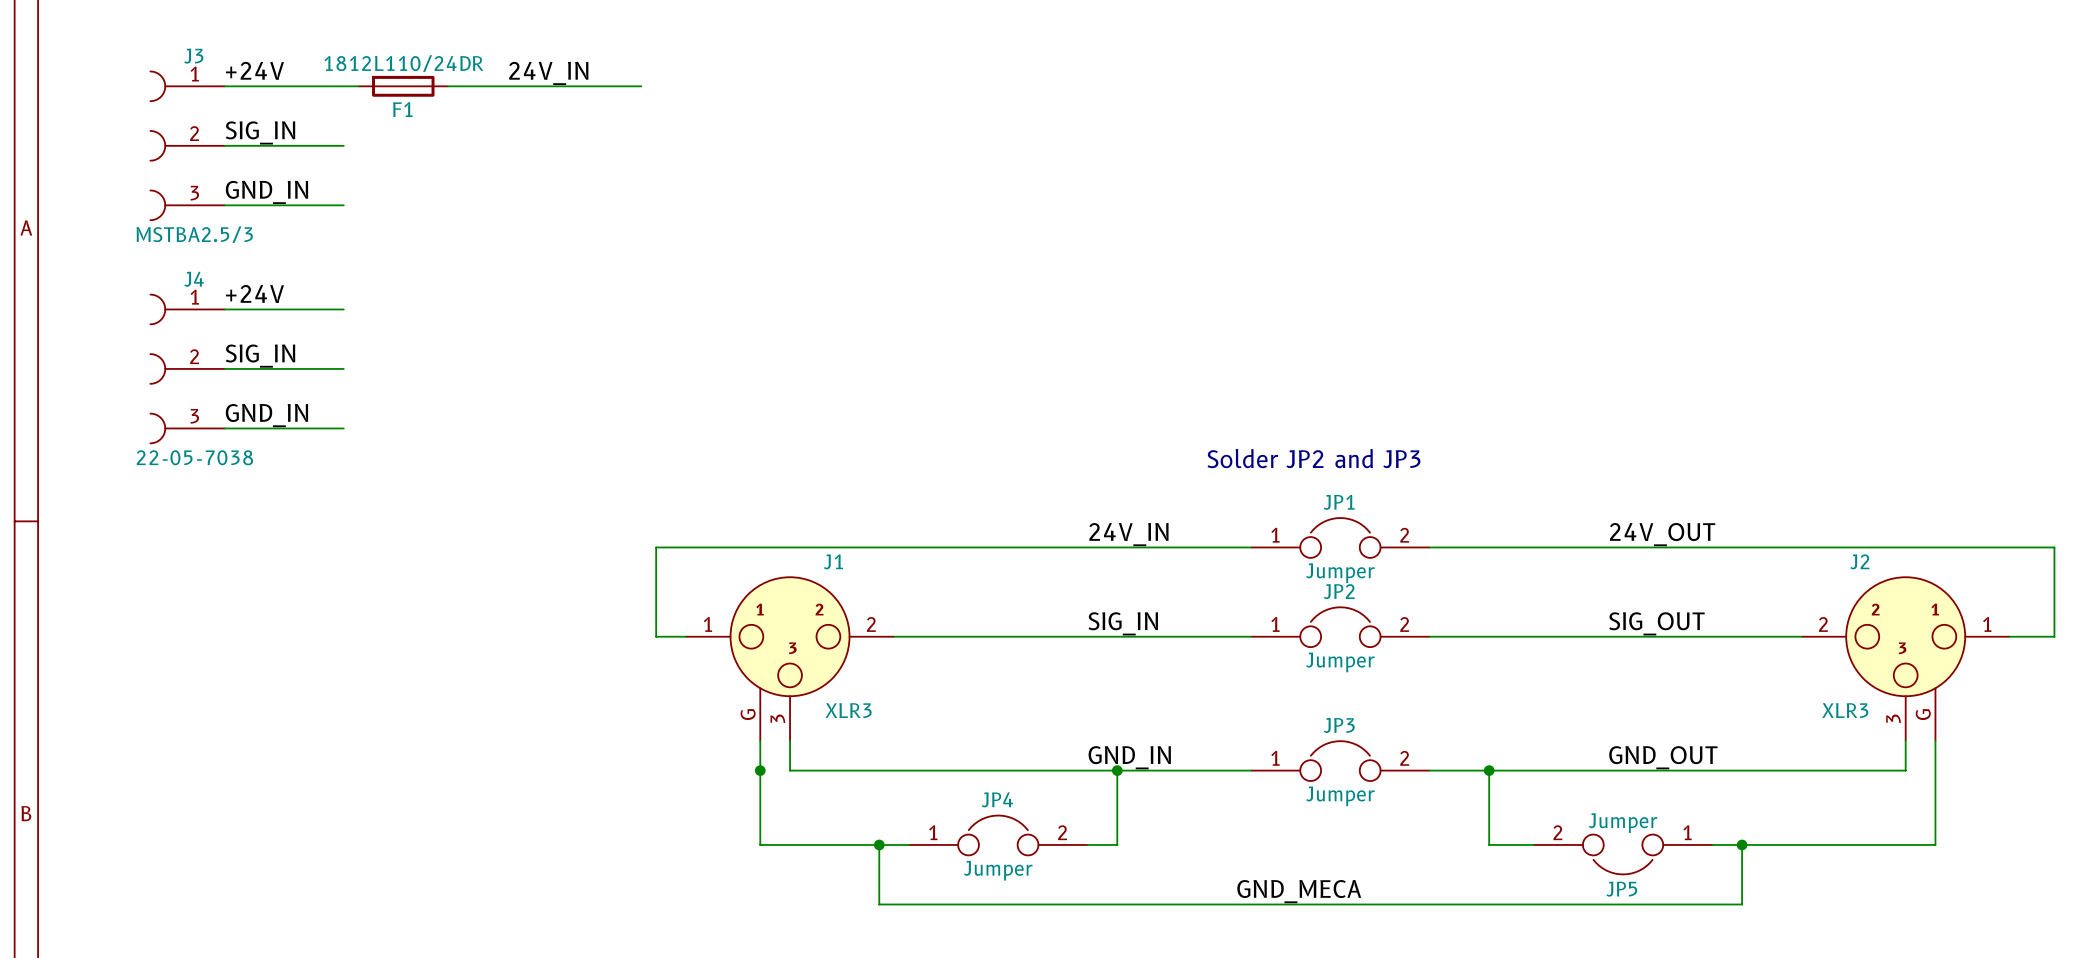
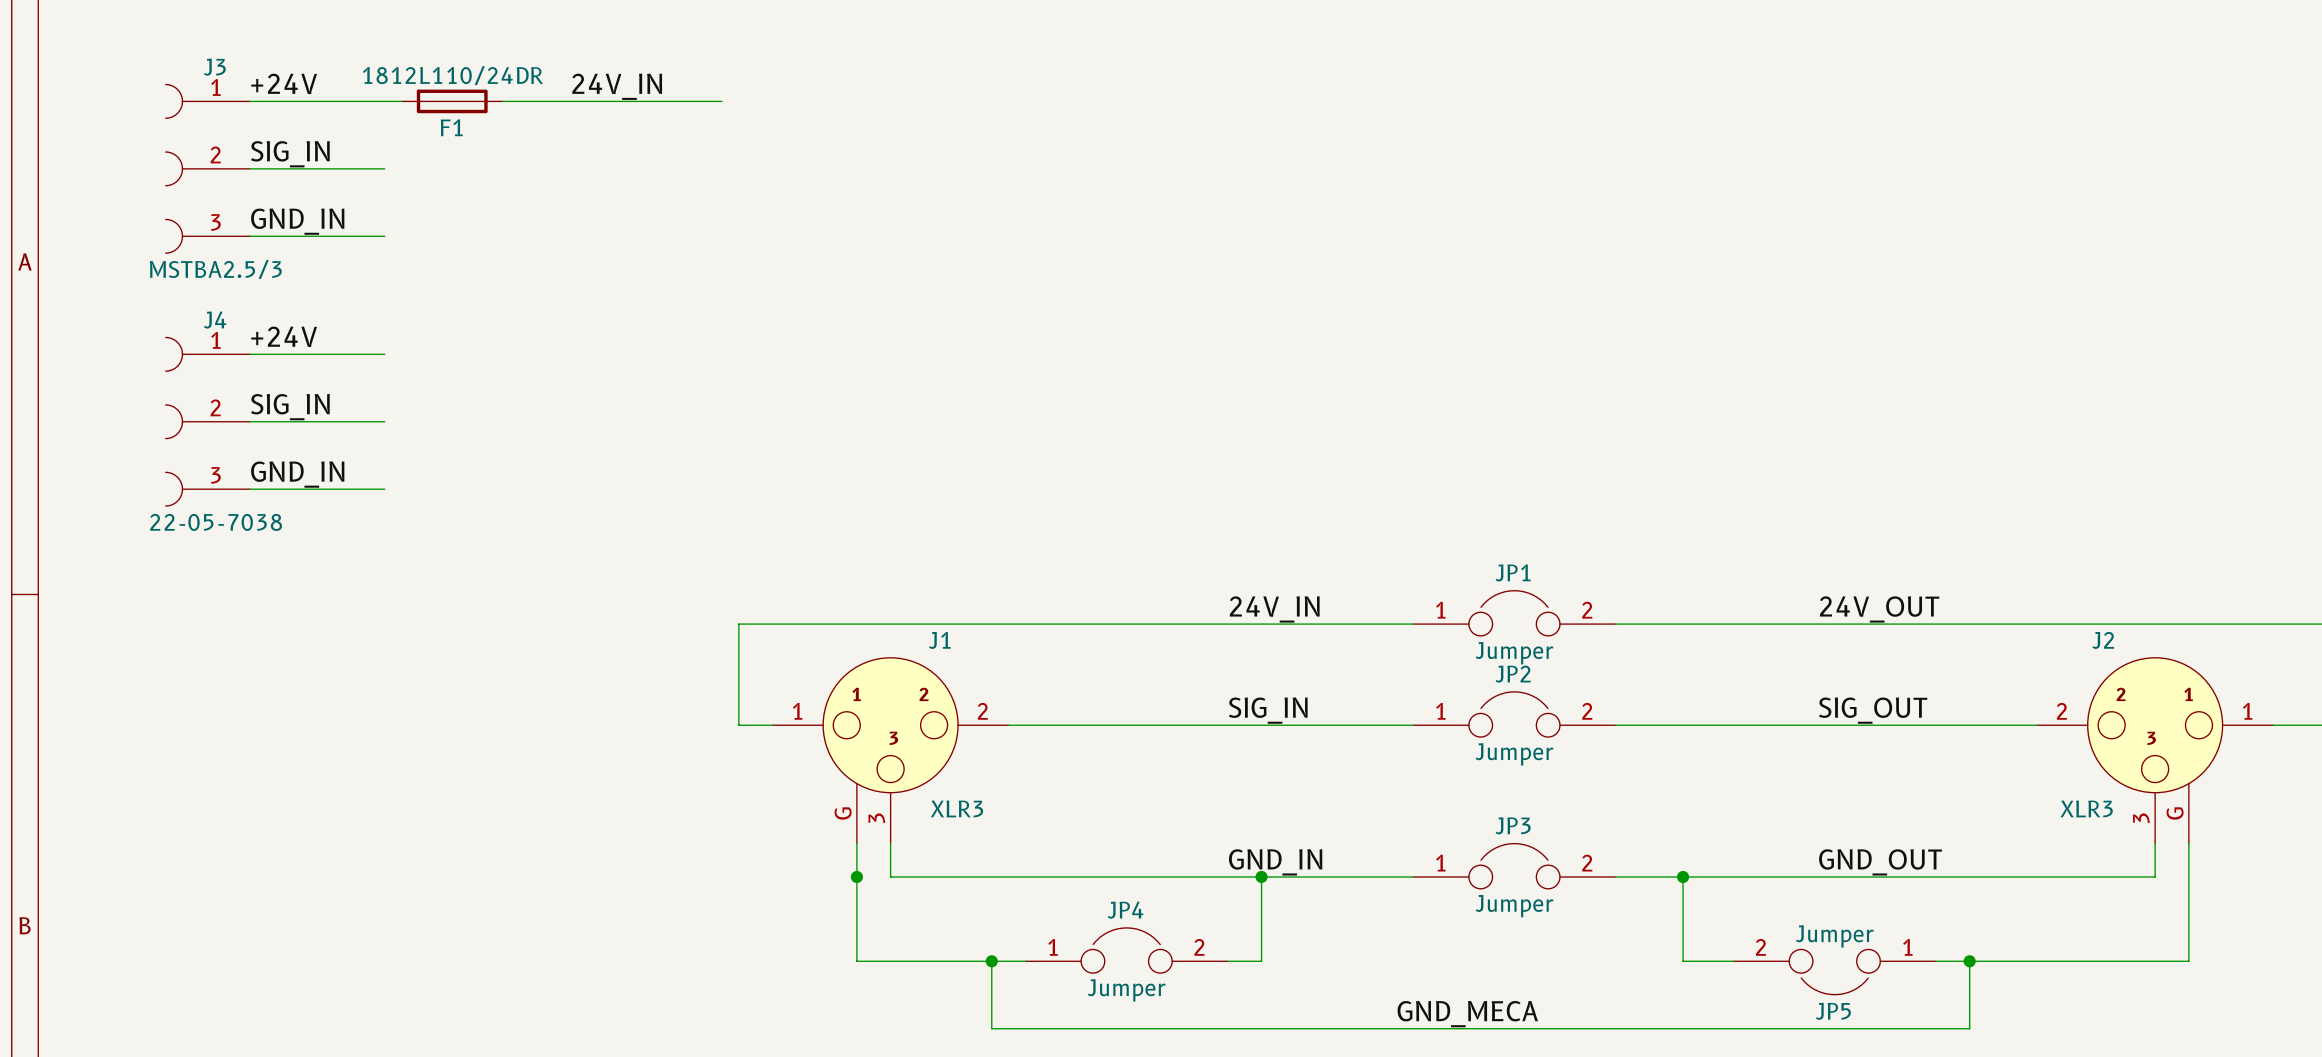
text: Solder JP2 and JP3 (1313, 458) -> none

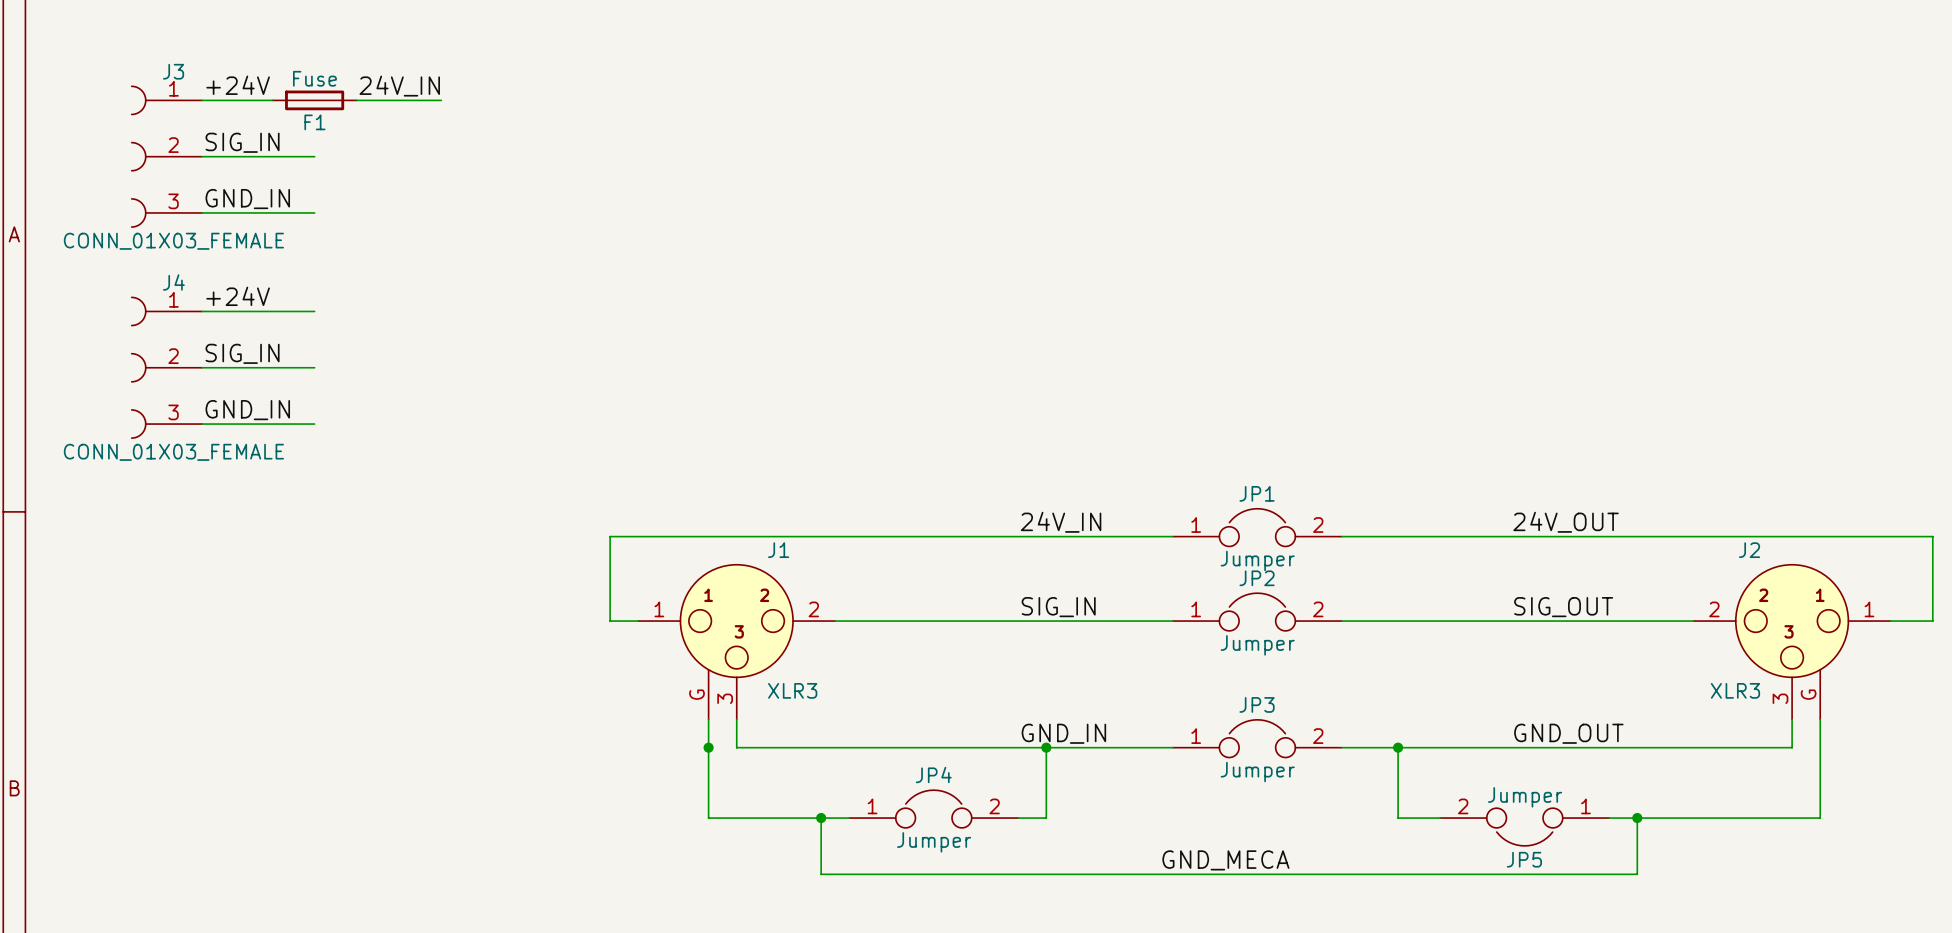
F1 value: 1812L110/24DR (452, 75) -> Fuse (314, 78)
label position: 24V_IN (617, 86) -> 24V_IN (399, 86)
F1 position: (452, 101) -> (314, 100)
wire: (536, 101) (722, 101) -> none
J3 value: MSTBA2.5/3 (215, 269) -> CONN_01X03_FEMALE (173, 241)
J4 value: 22-05-7038 (216, 522) -> CONN_01X03_FEMALE (173, 452)

